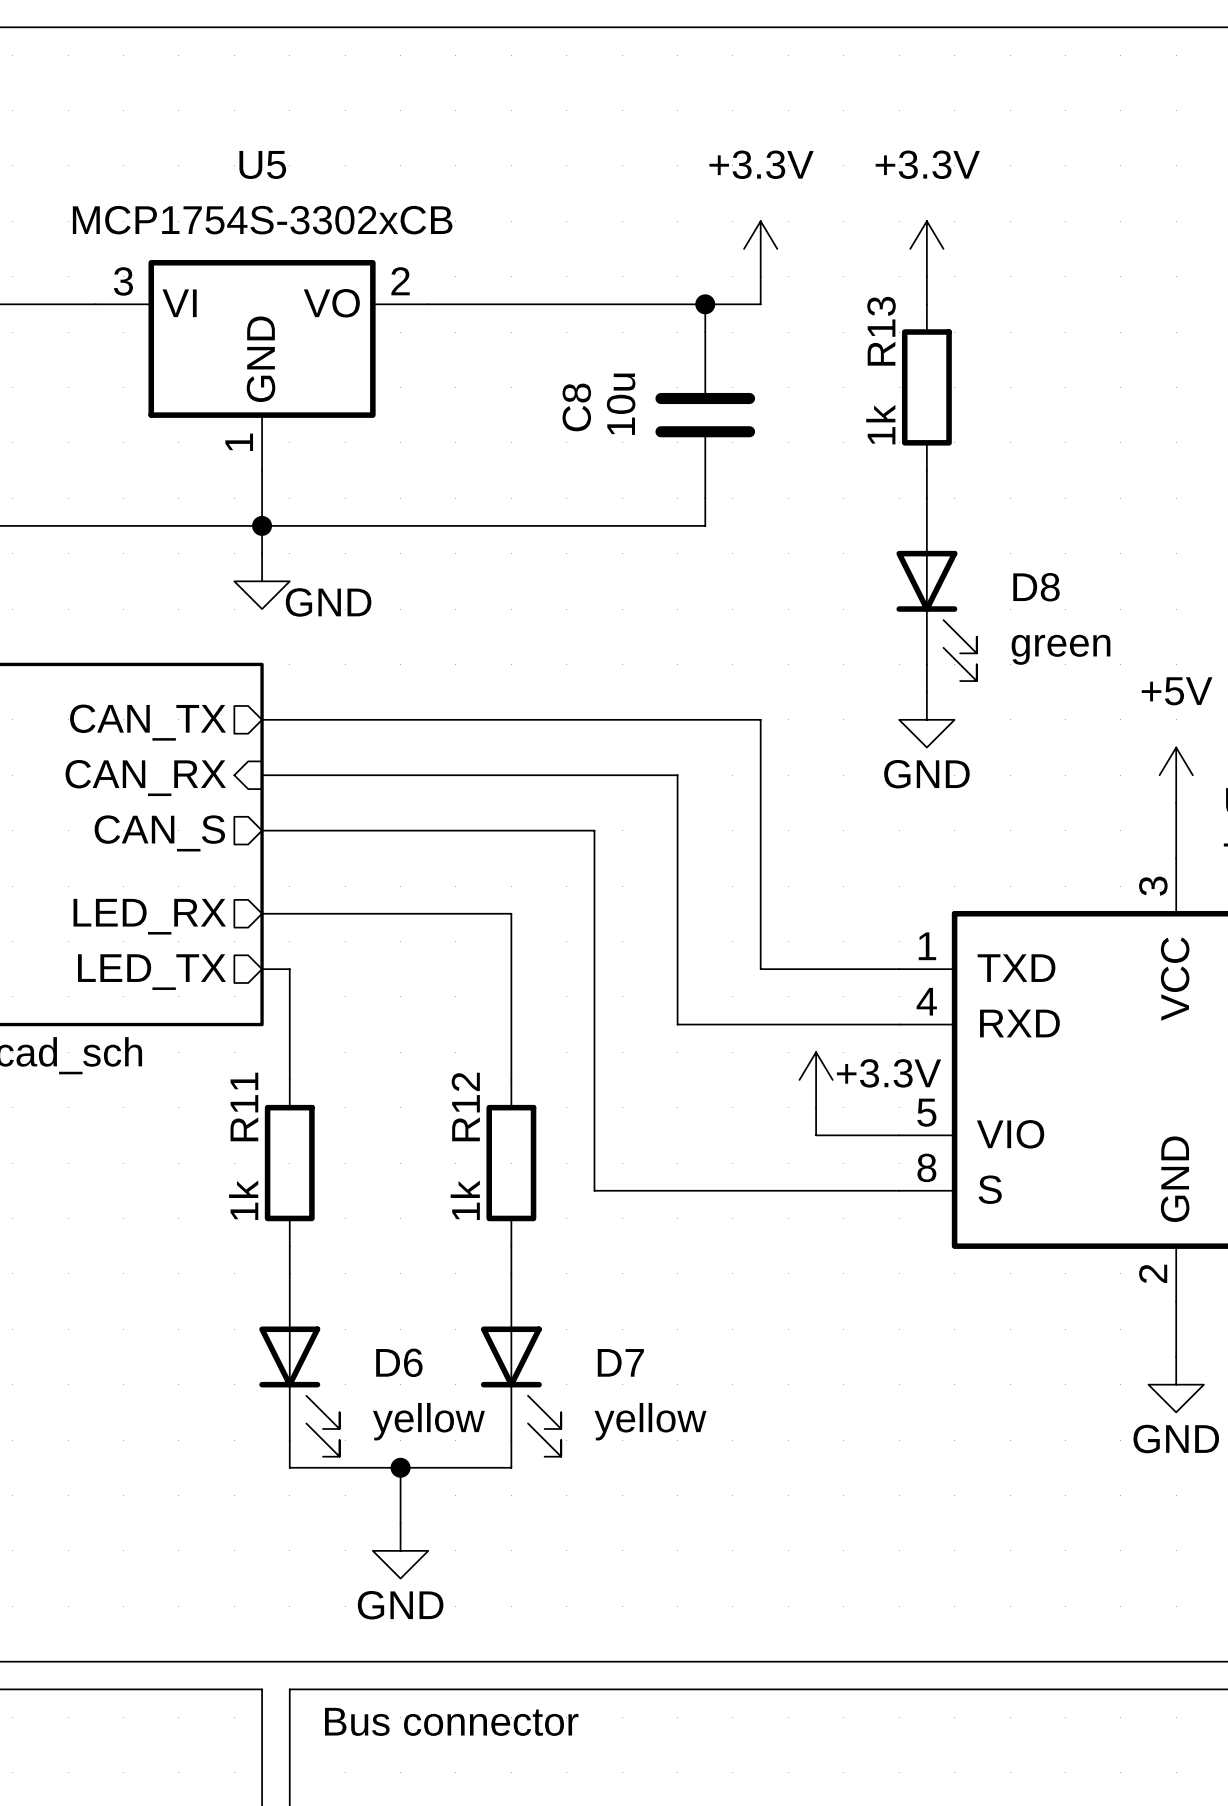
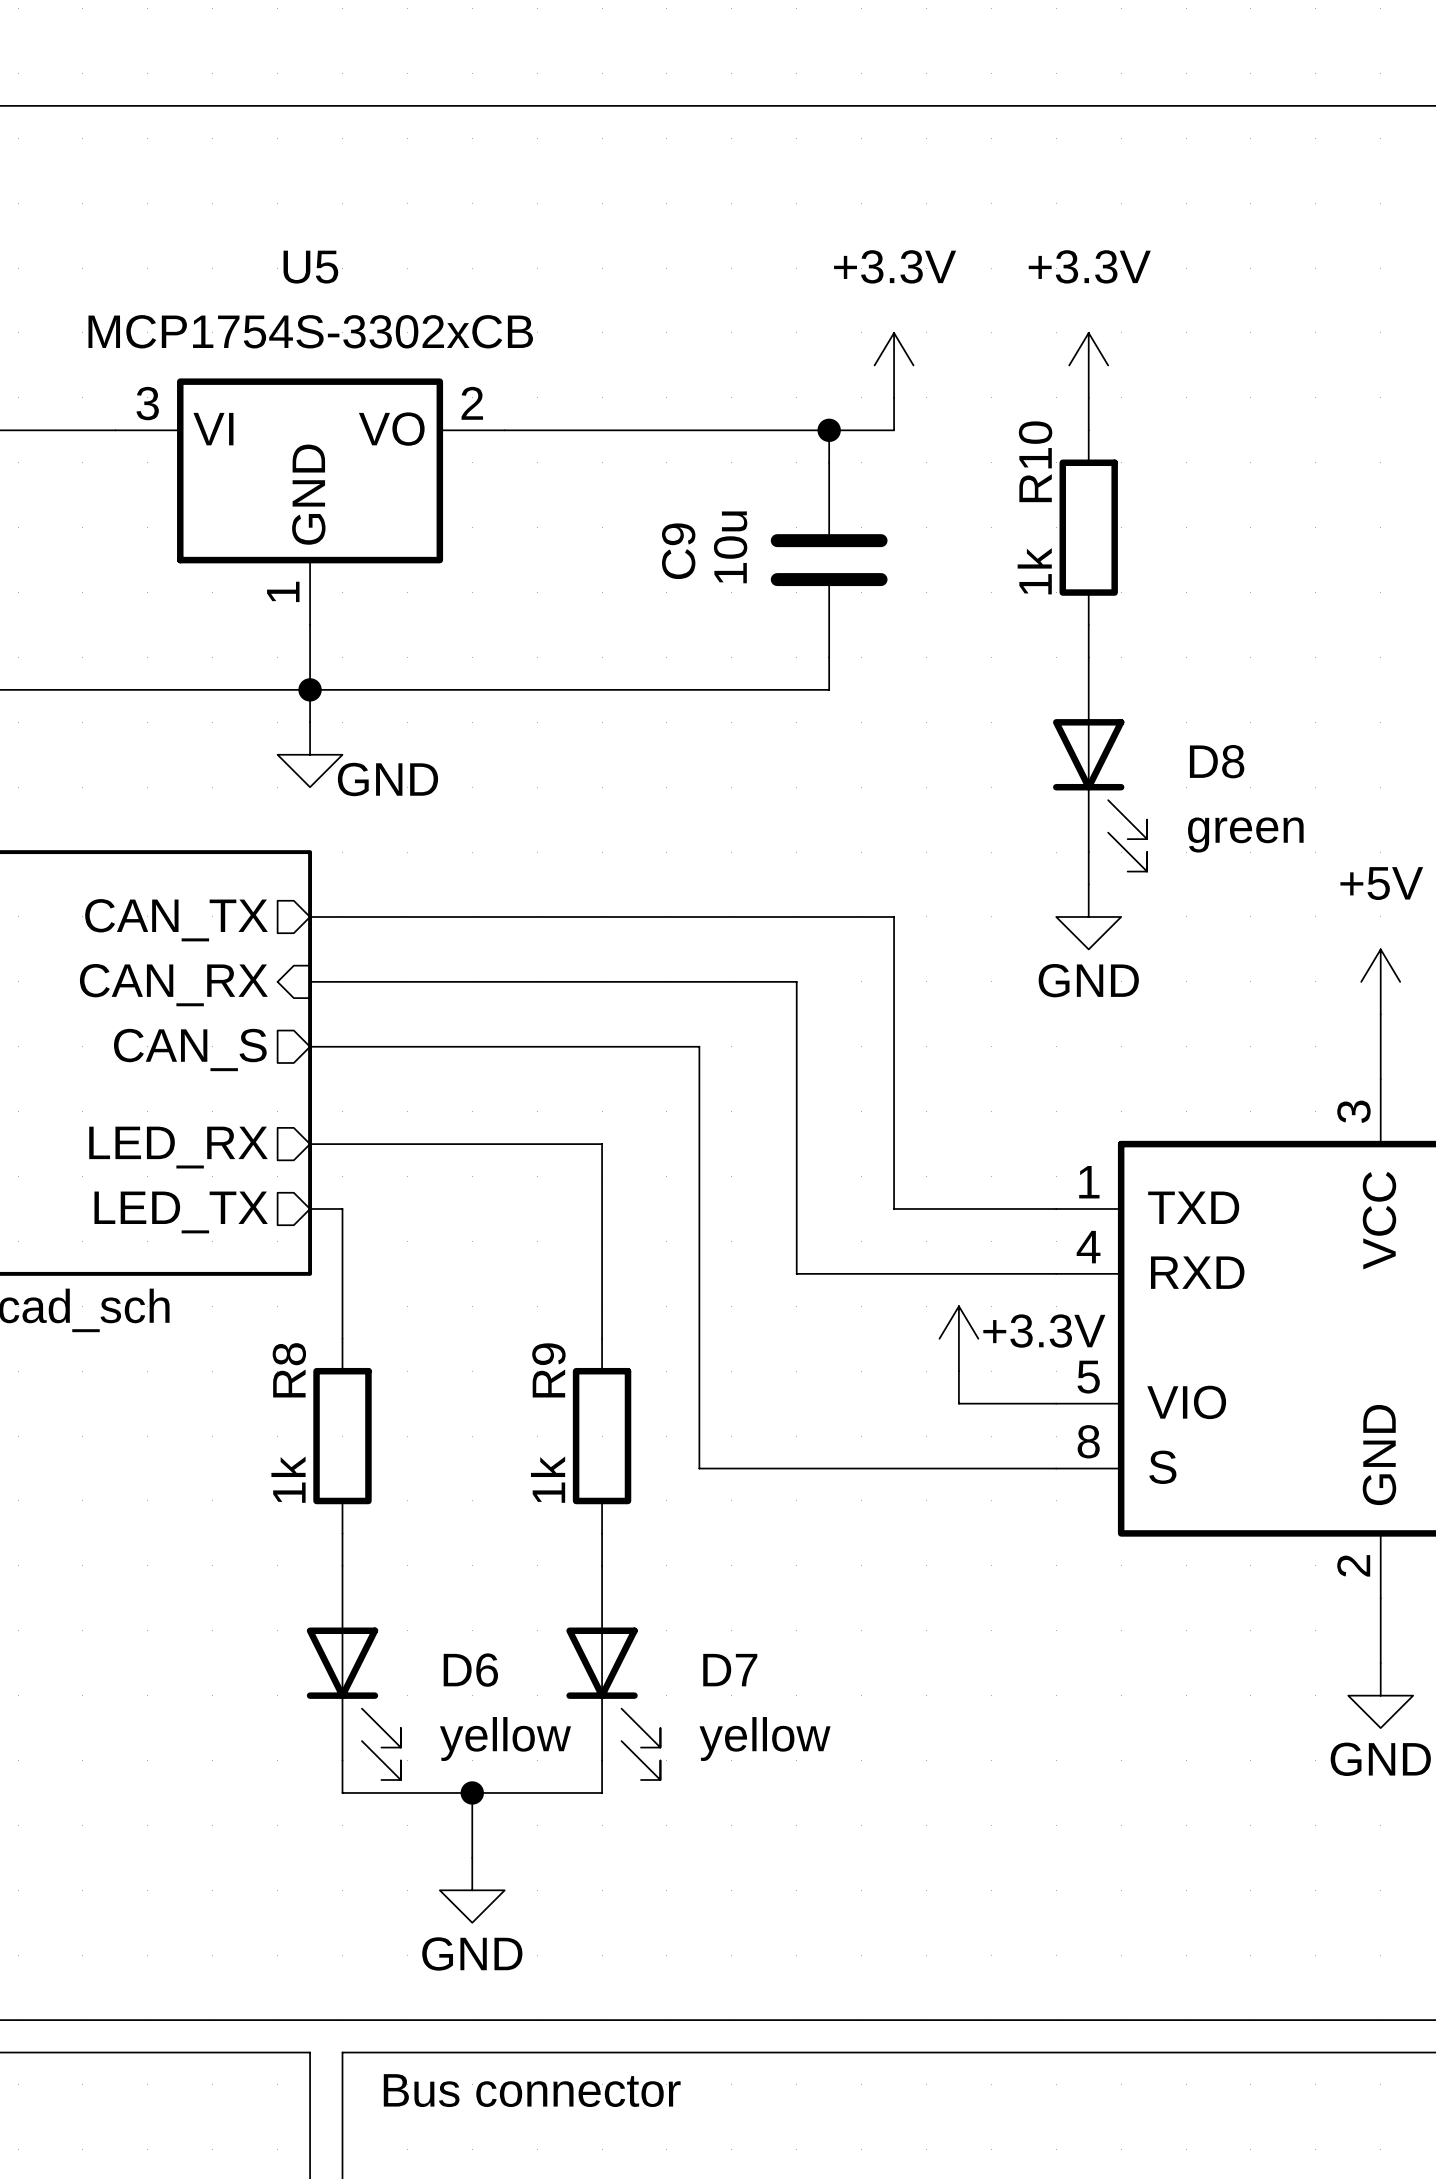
R13 name: R13 (881, 331) -> R10 (1035, 461)
C8 name: C8 (576, 407) -> C9 (678, 551)
R11 name: R11 (244, 1106) -> R8 (289, 1370)
R12 name: R12 (465, 1107) -> R9 (548, 1370)

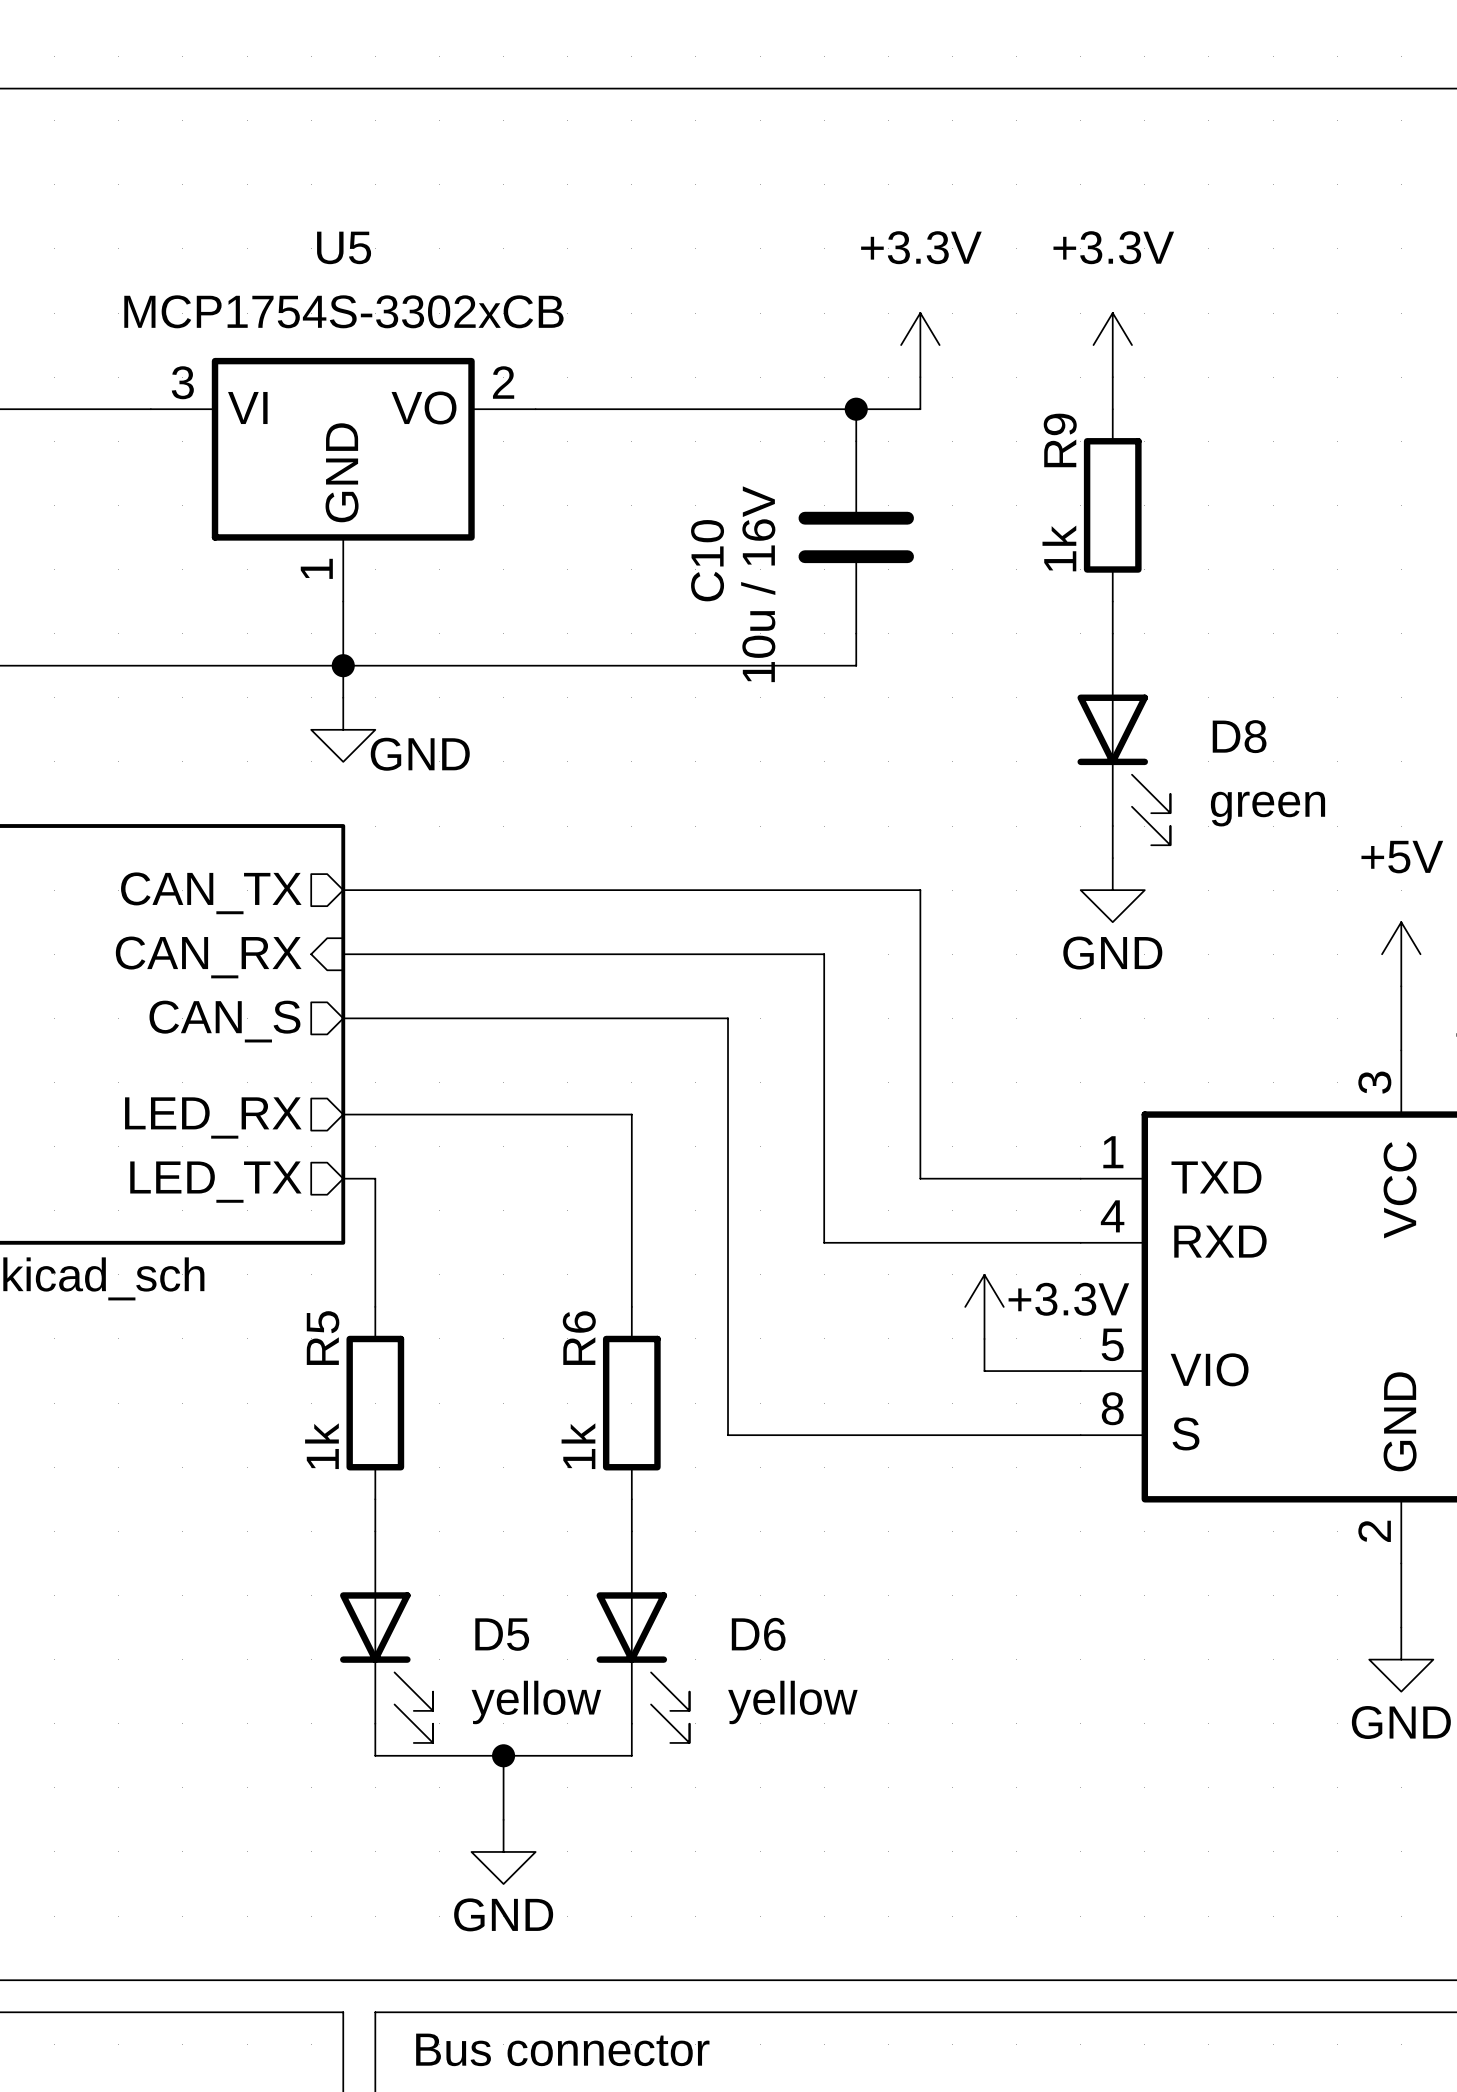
R10 name: R10 (1035, 461) -> R9 (1060, 440)
C9 value: 10u (730, 547) -> 10u / 16V (758, 584)
C9 name: C9 (678, 551) -> C10 (707, 560)
R8 name: R8 (289, 1370) -> R5 (323, 1338)
R9 name: R9 (548, 1370) -> R6 (579, 1338)
D6 name: D6 (470, 1670) -> D5 (502, 1634)
D7 name: D7 (730, 1670) -> D6 (758, 1634)

